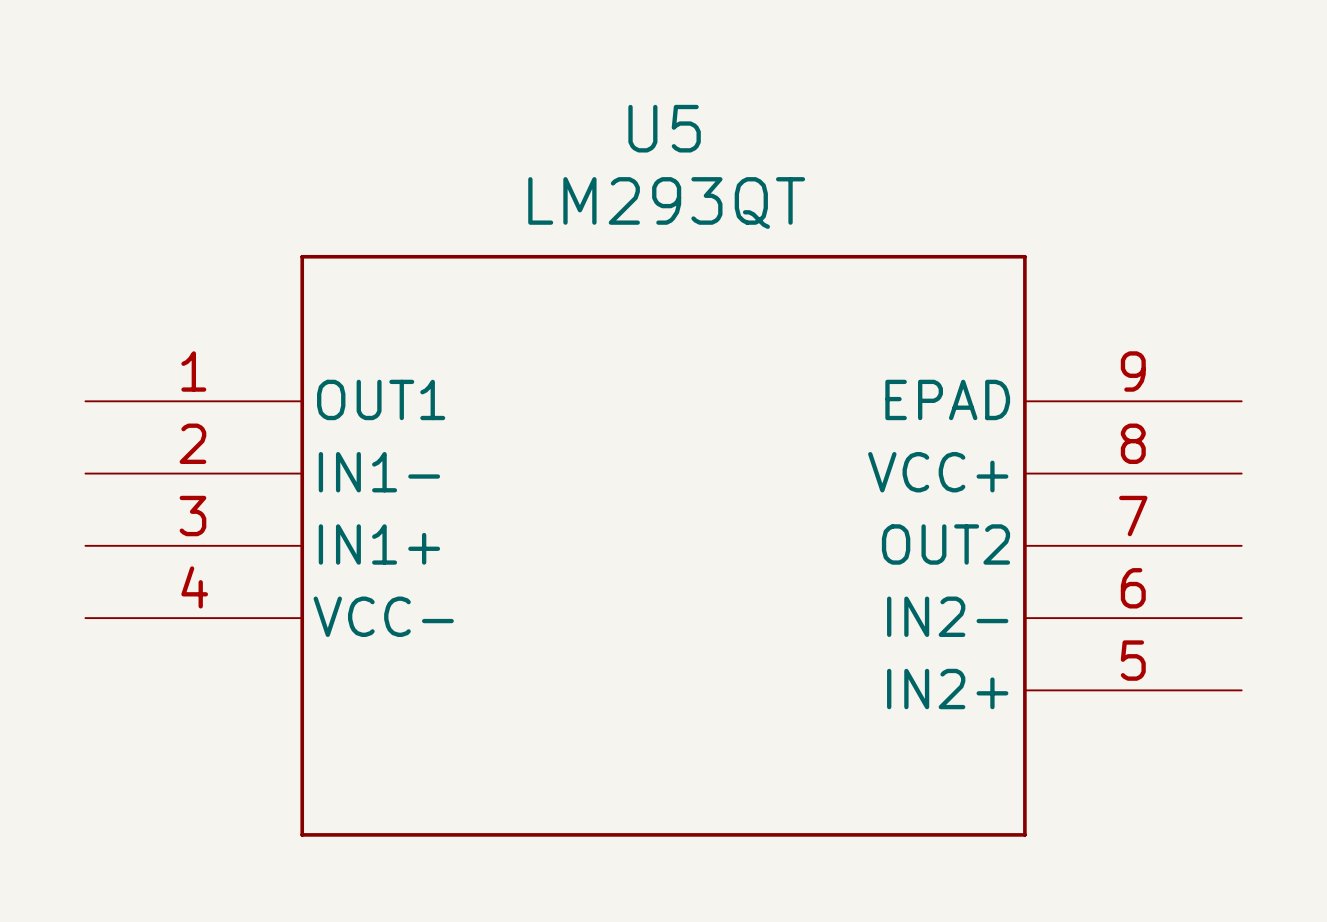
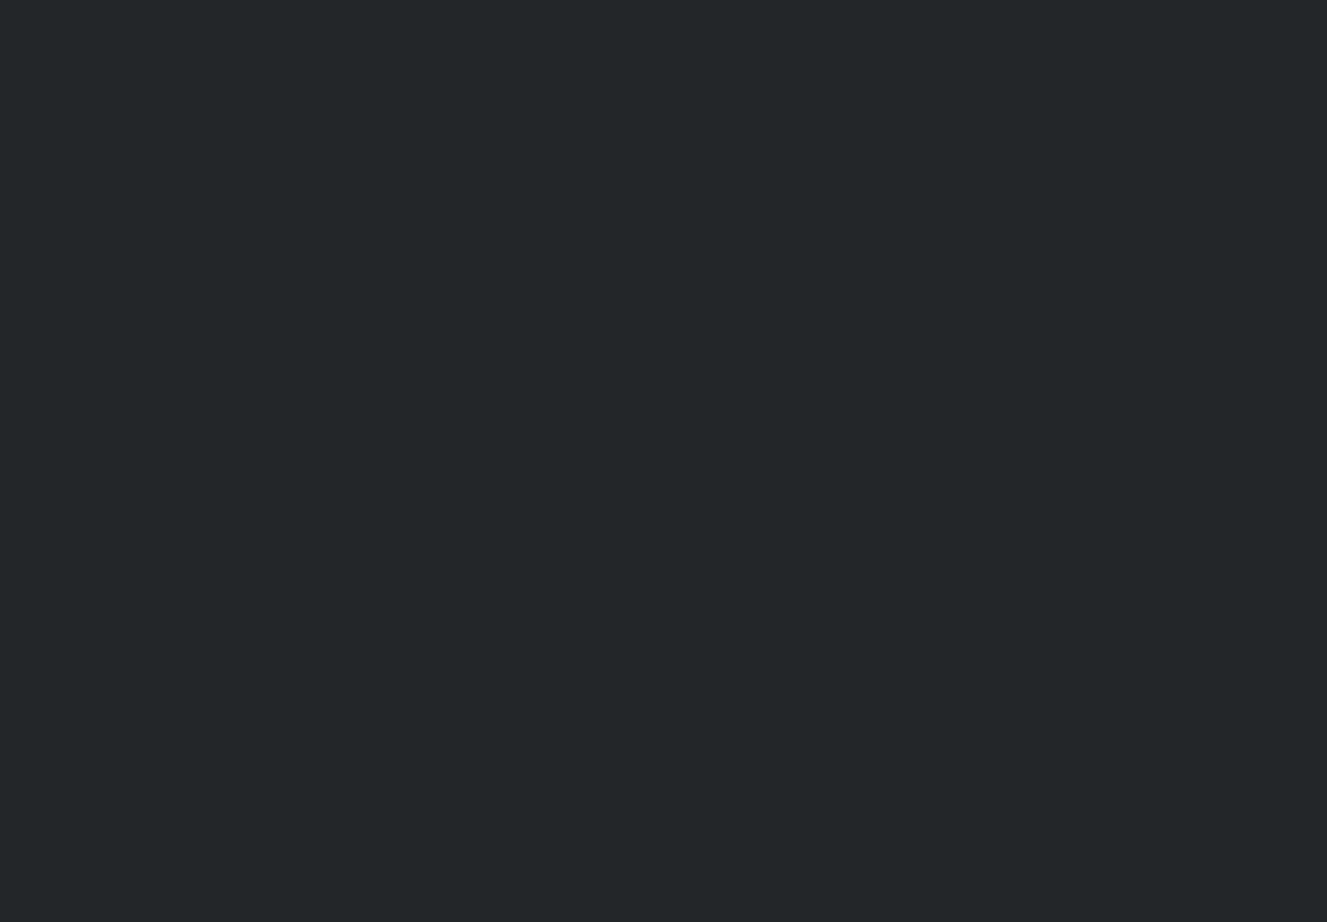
U5: LM293QT (663, 545) -> none

